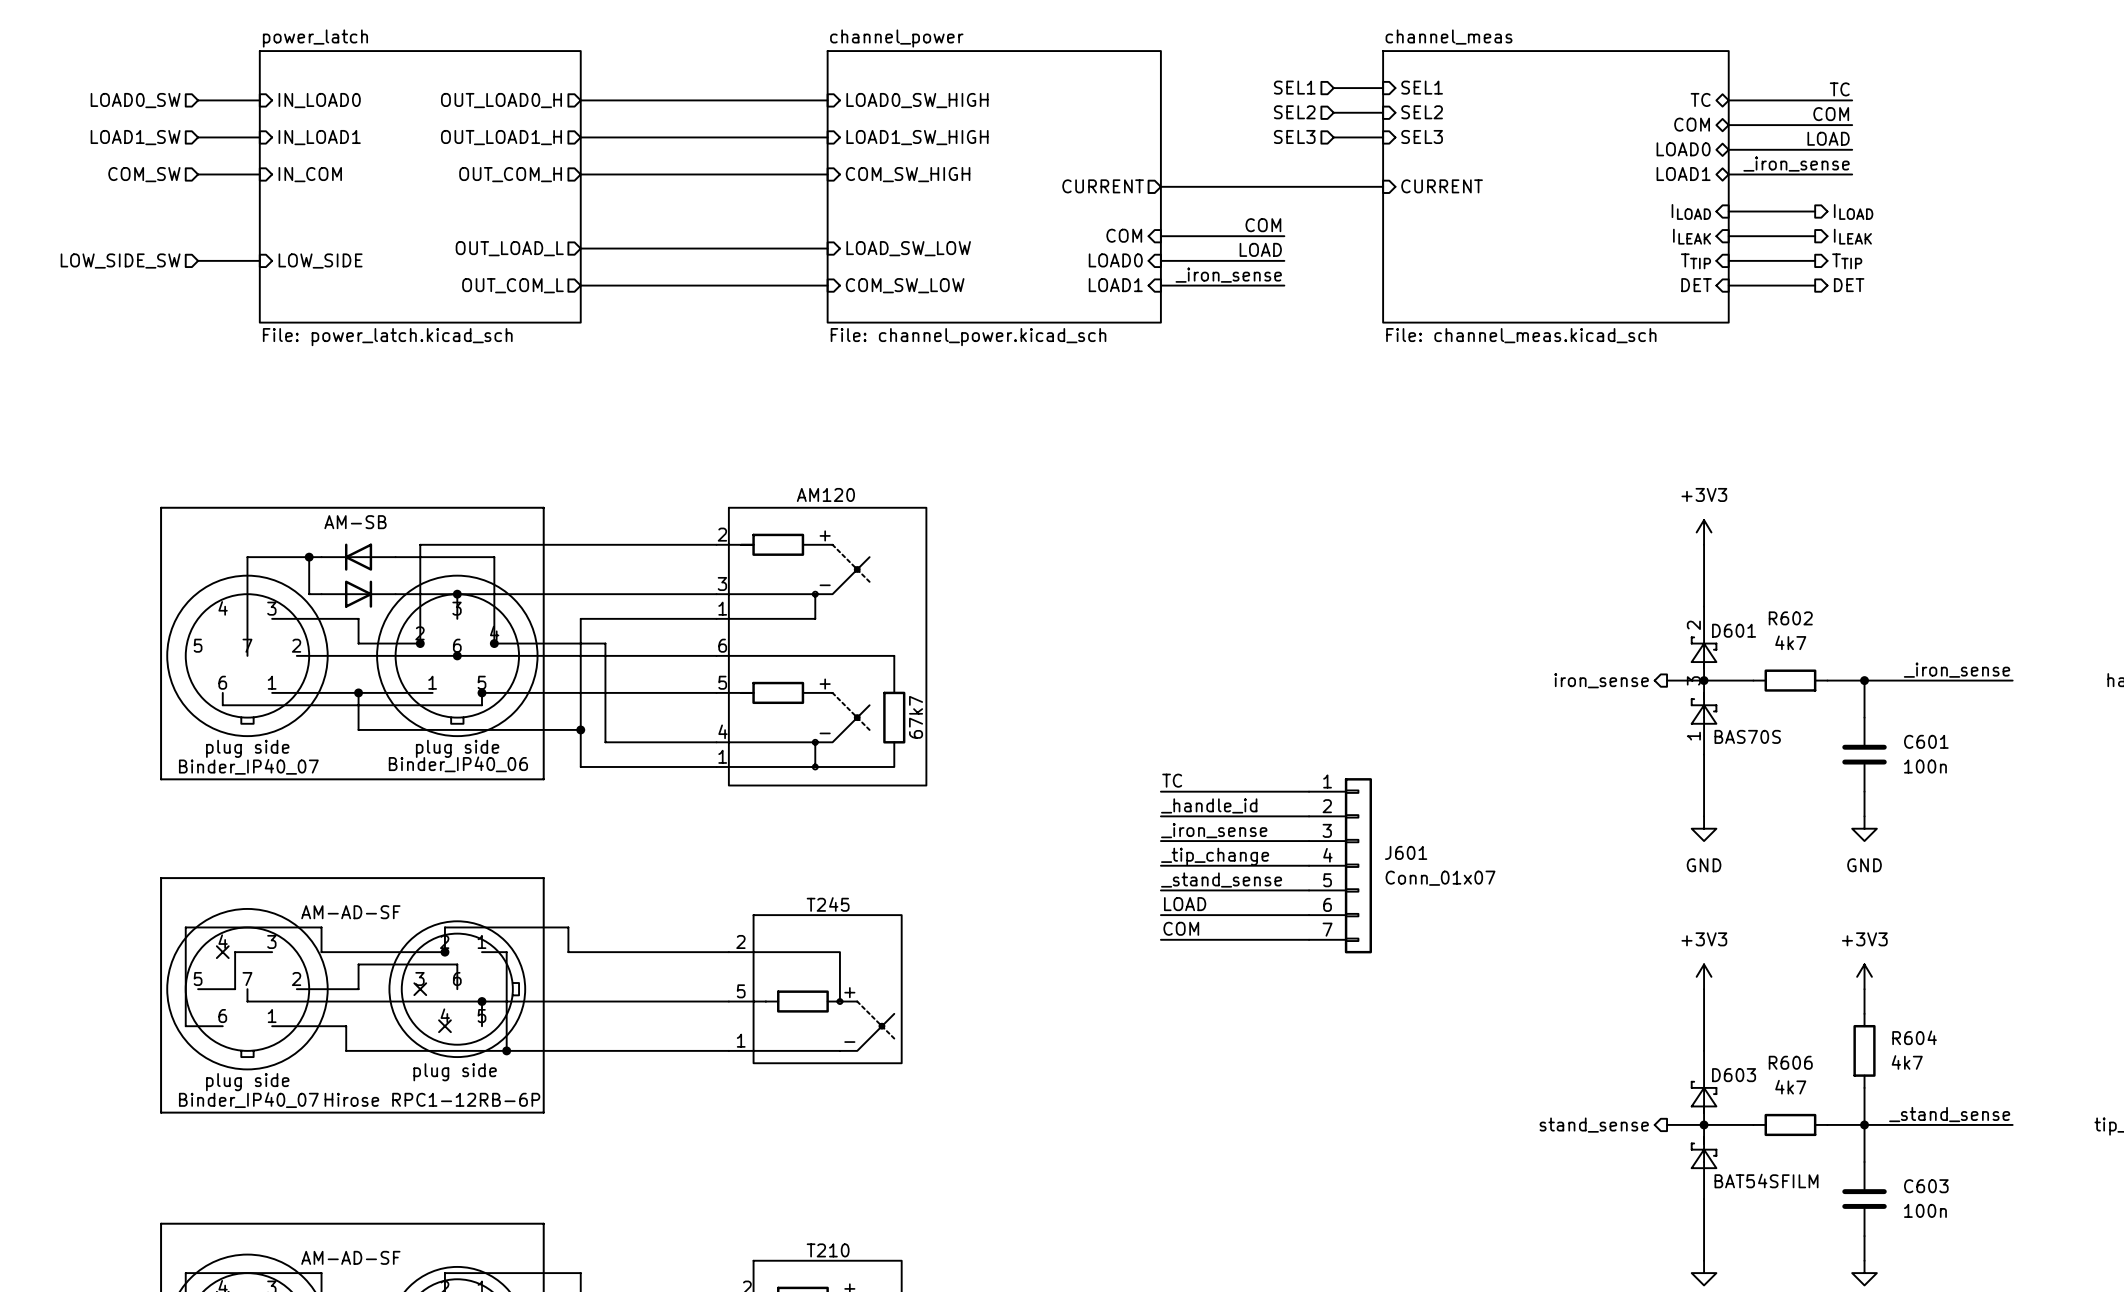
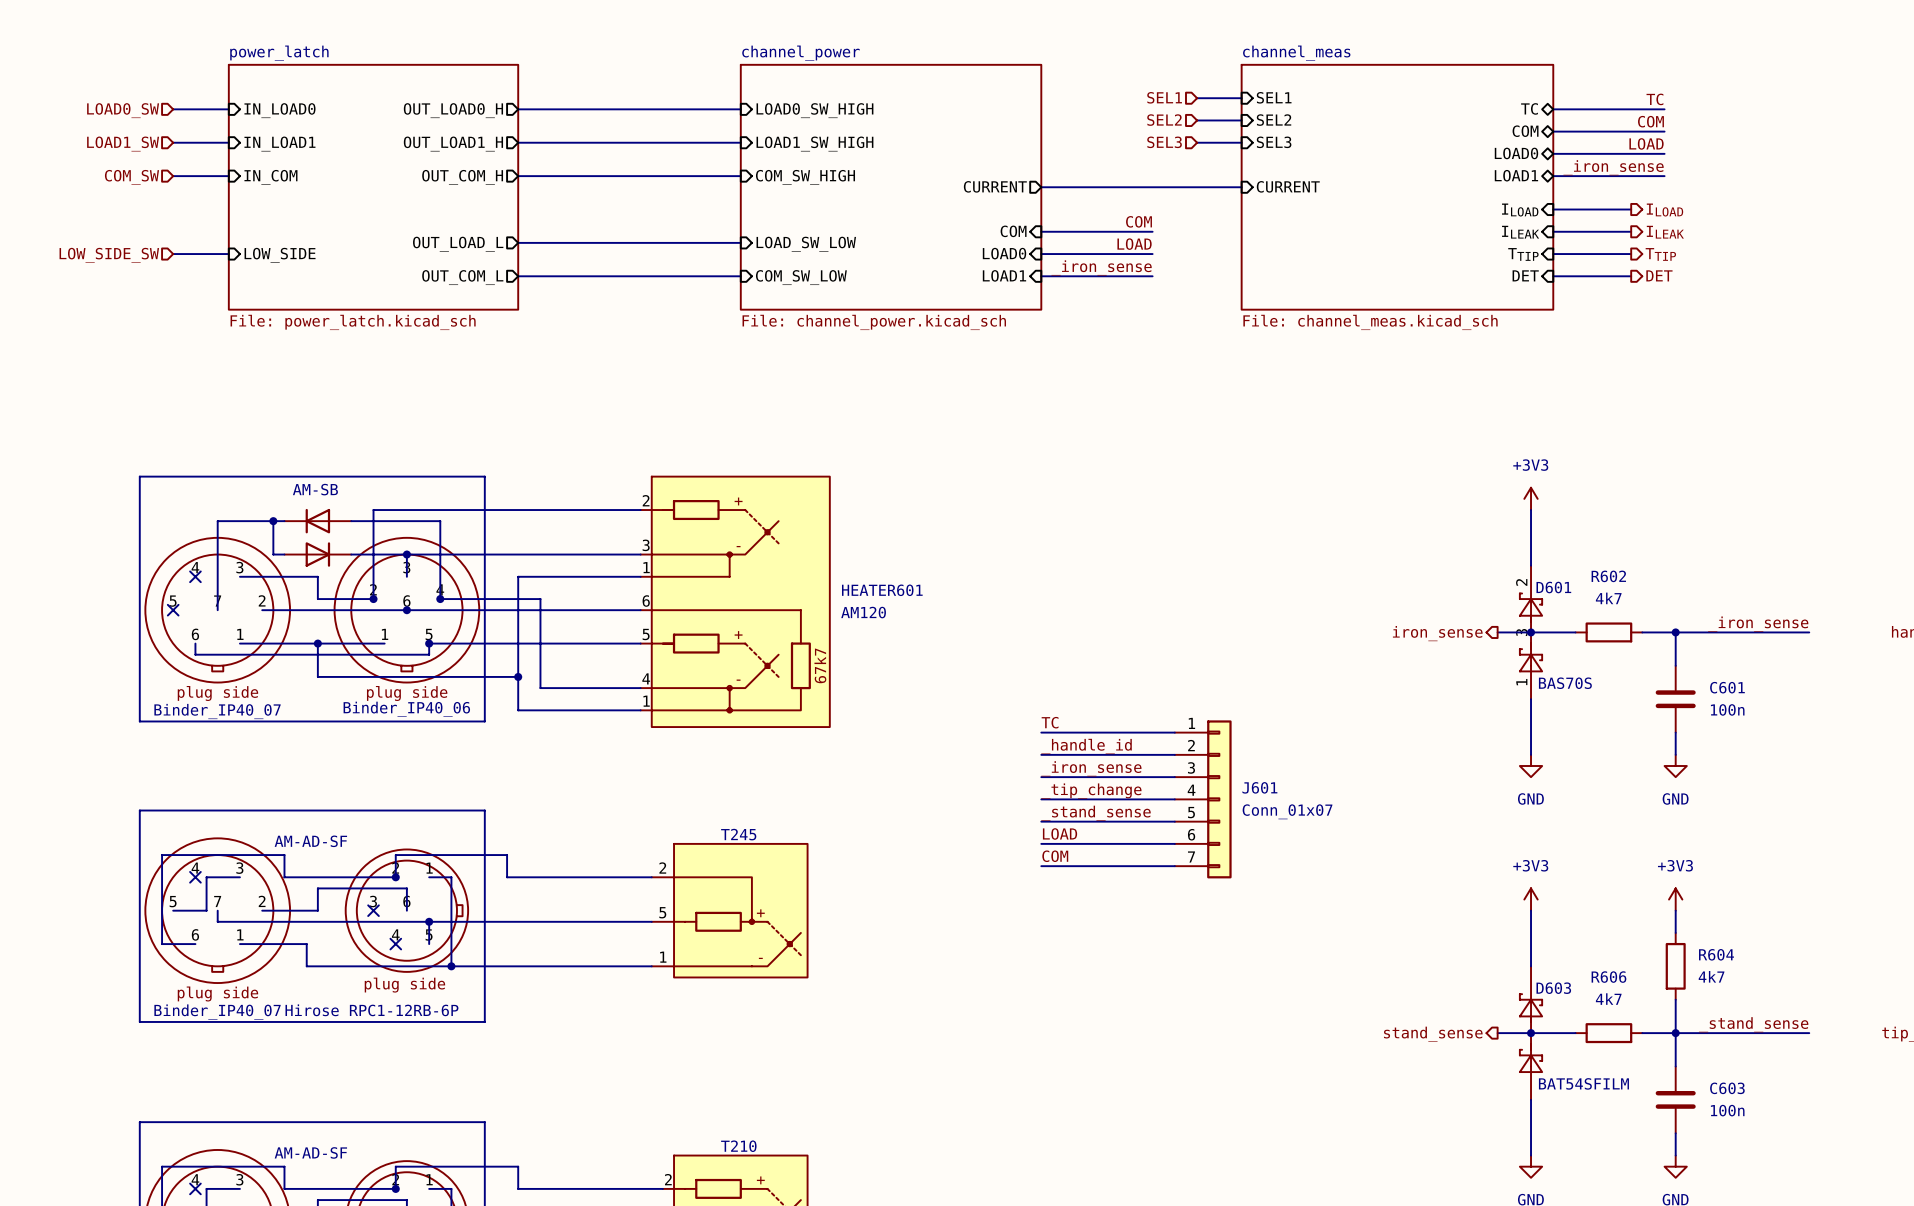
HEATER601 value position: AM120 (825, 494) -> AM120 (863, 612)
no-connect mark: none -> (195, 576)
HEATER601 name: none -> HEATER601 (882, 590)
no-connect mark: none -> (173, 610)

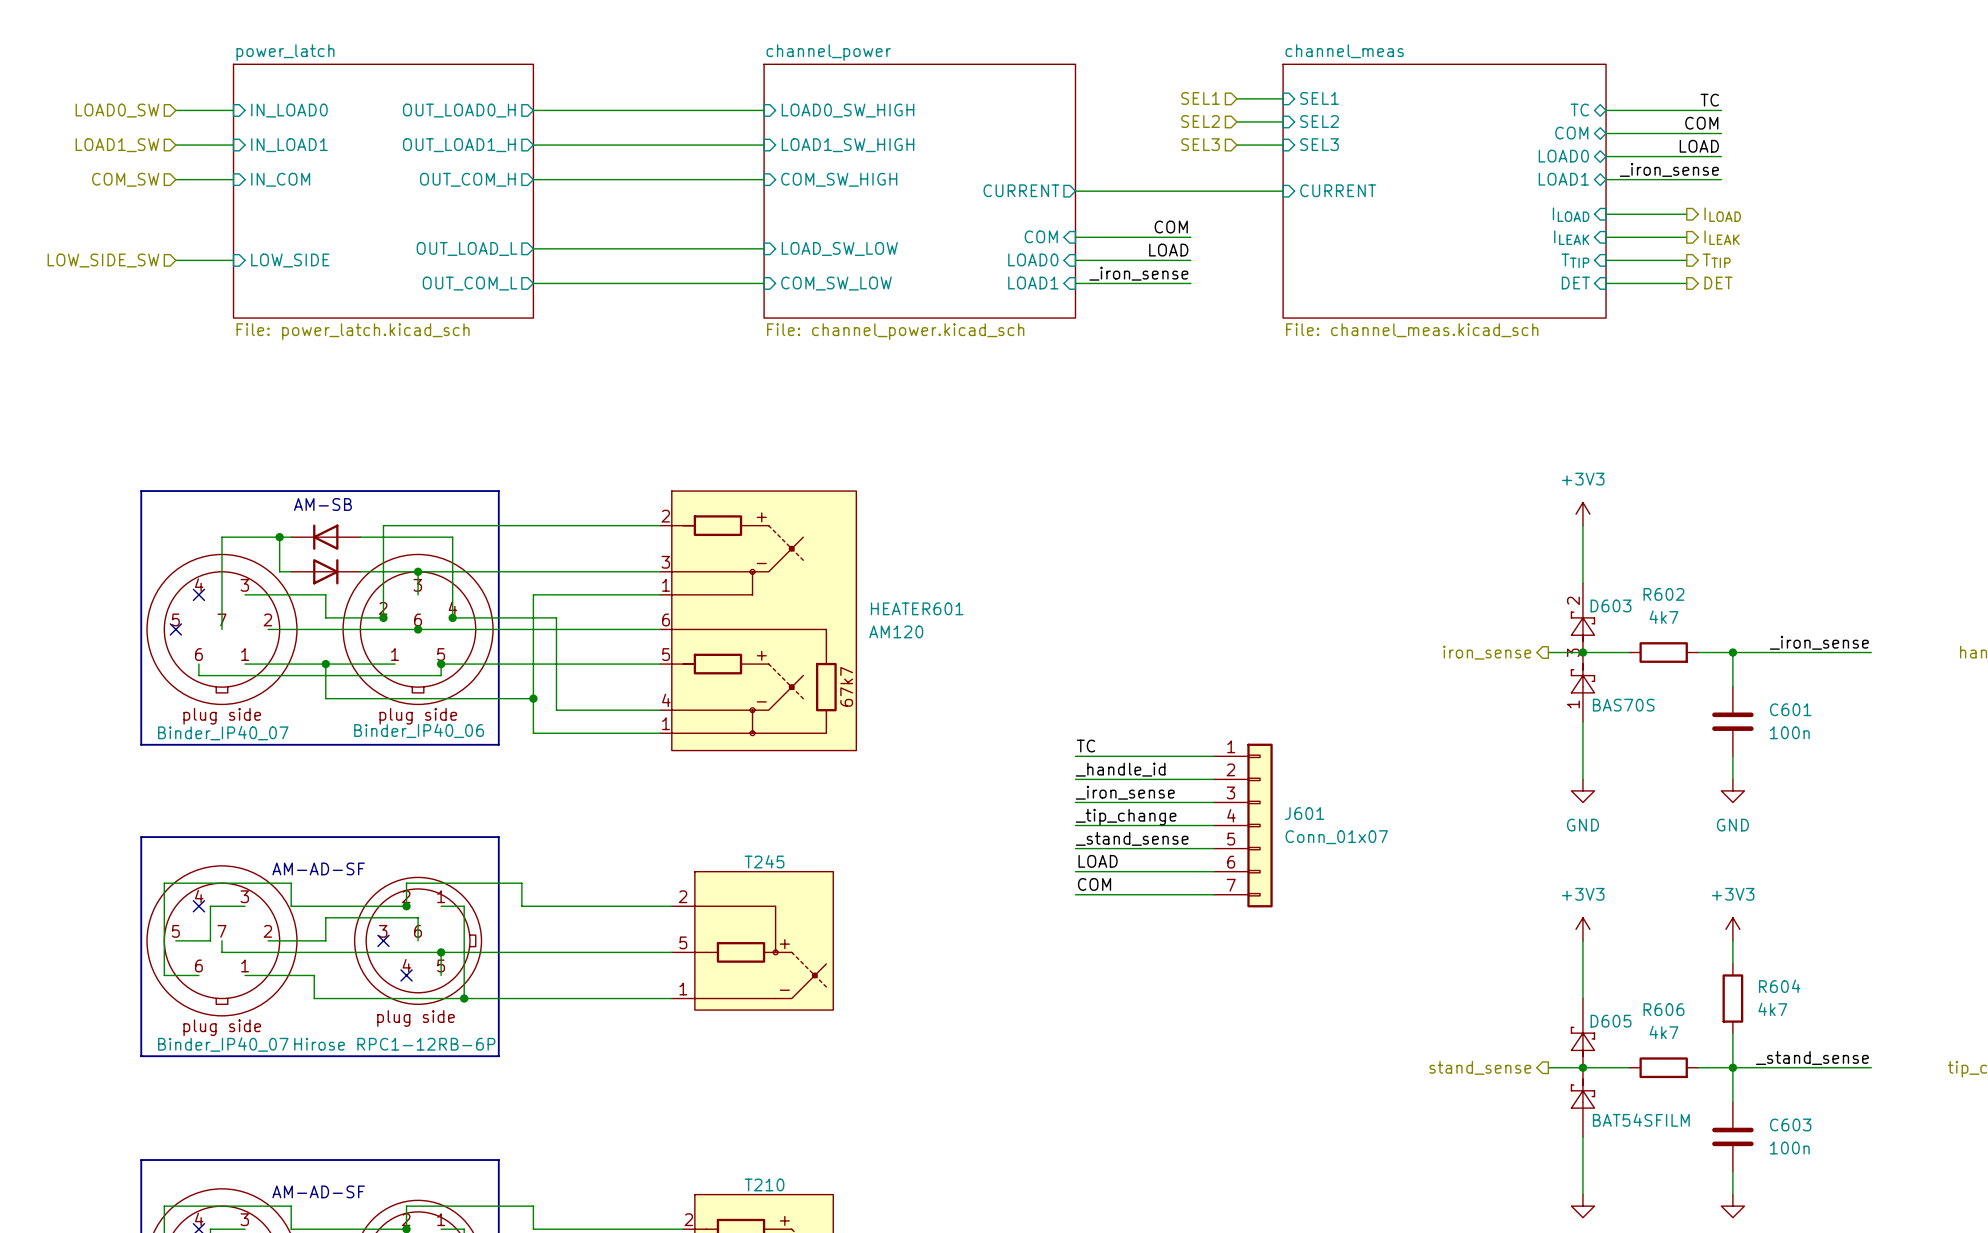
D601 name: D601 (1553, 587) -> D603 (1611, 605)
D603 name: D603 (1553, 988) -> D605 (1611, 1021)

